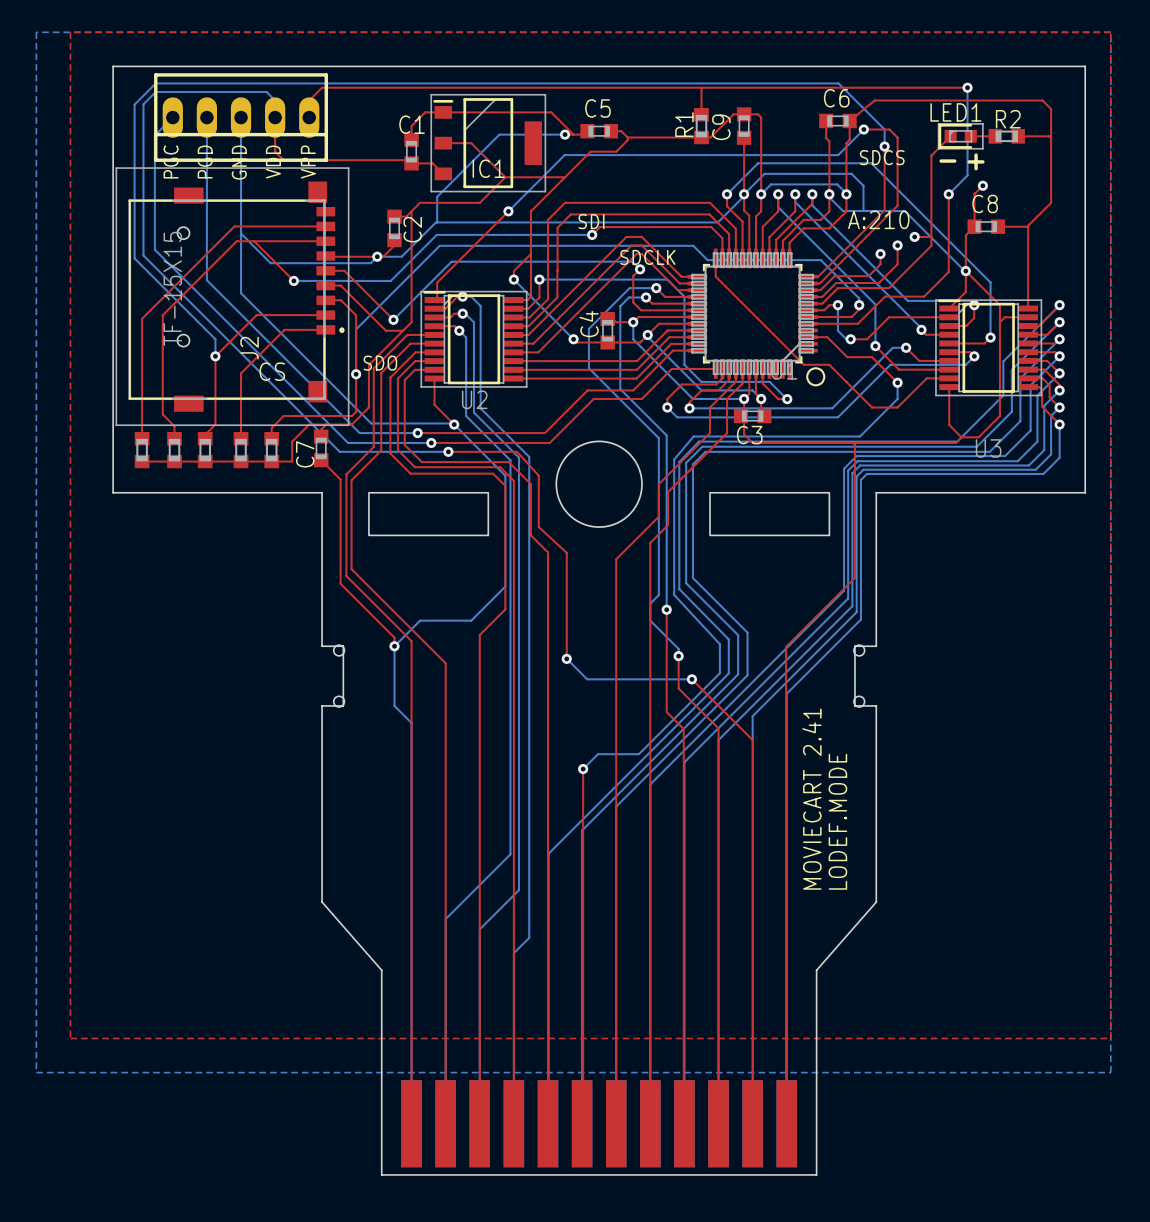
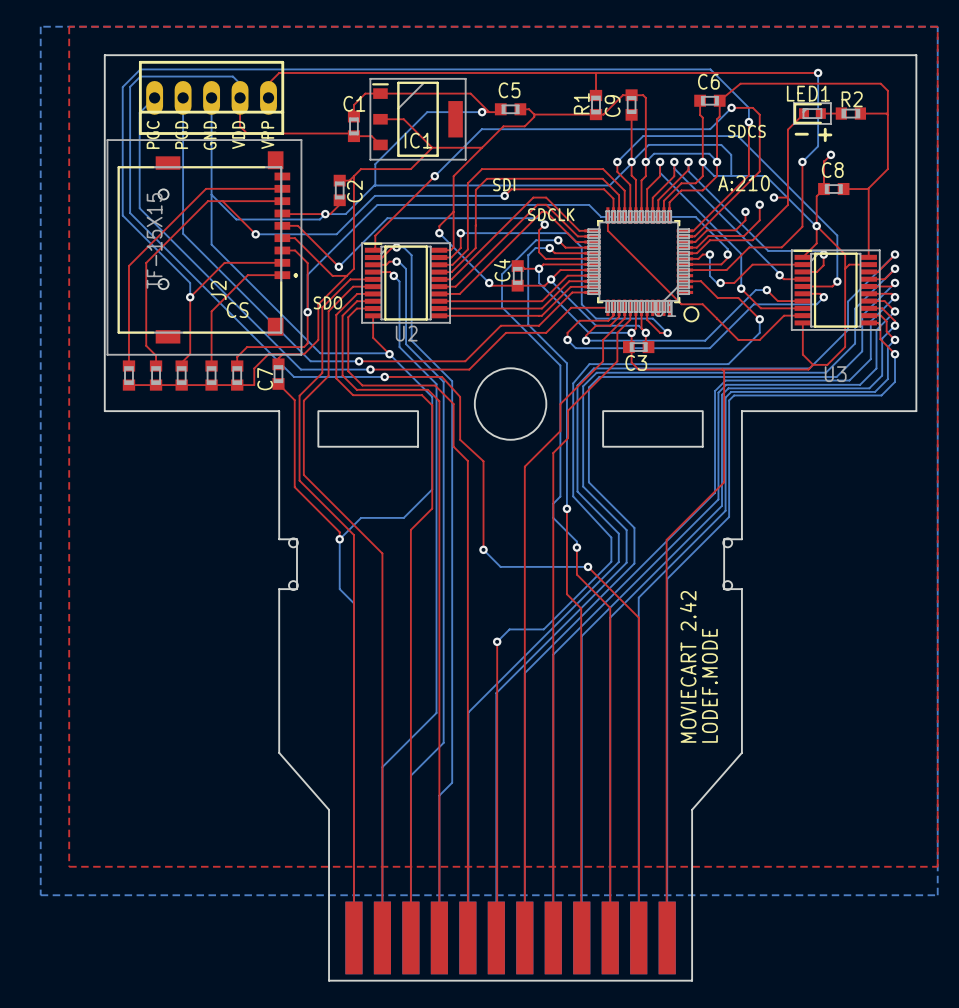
text: MOVIECART 2.41 (811, 799) -> MOVIECART 2.42 (688, 666)

